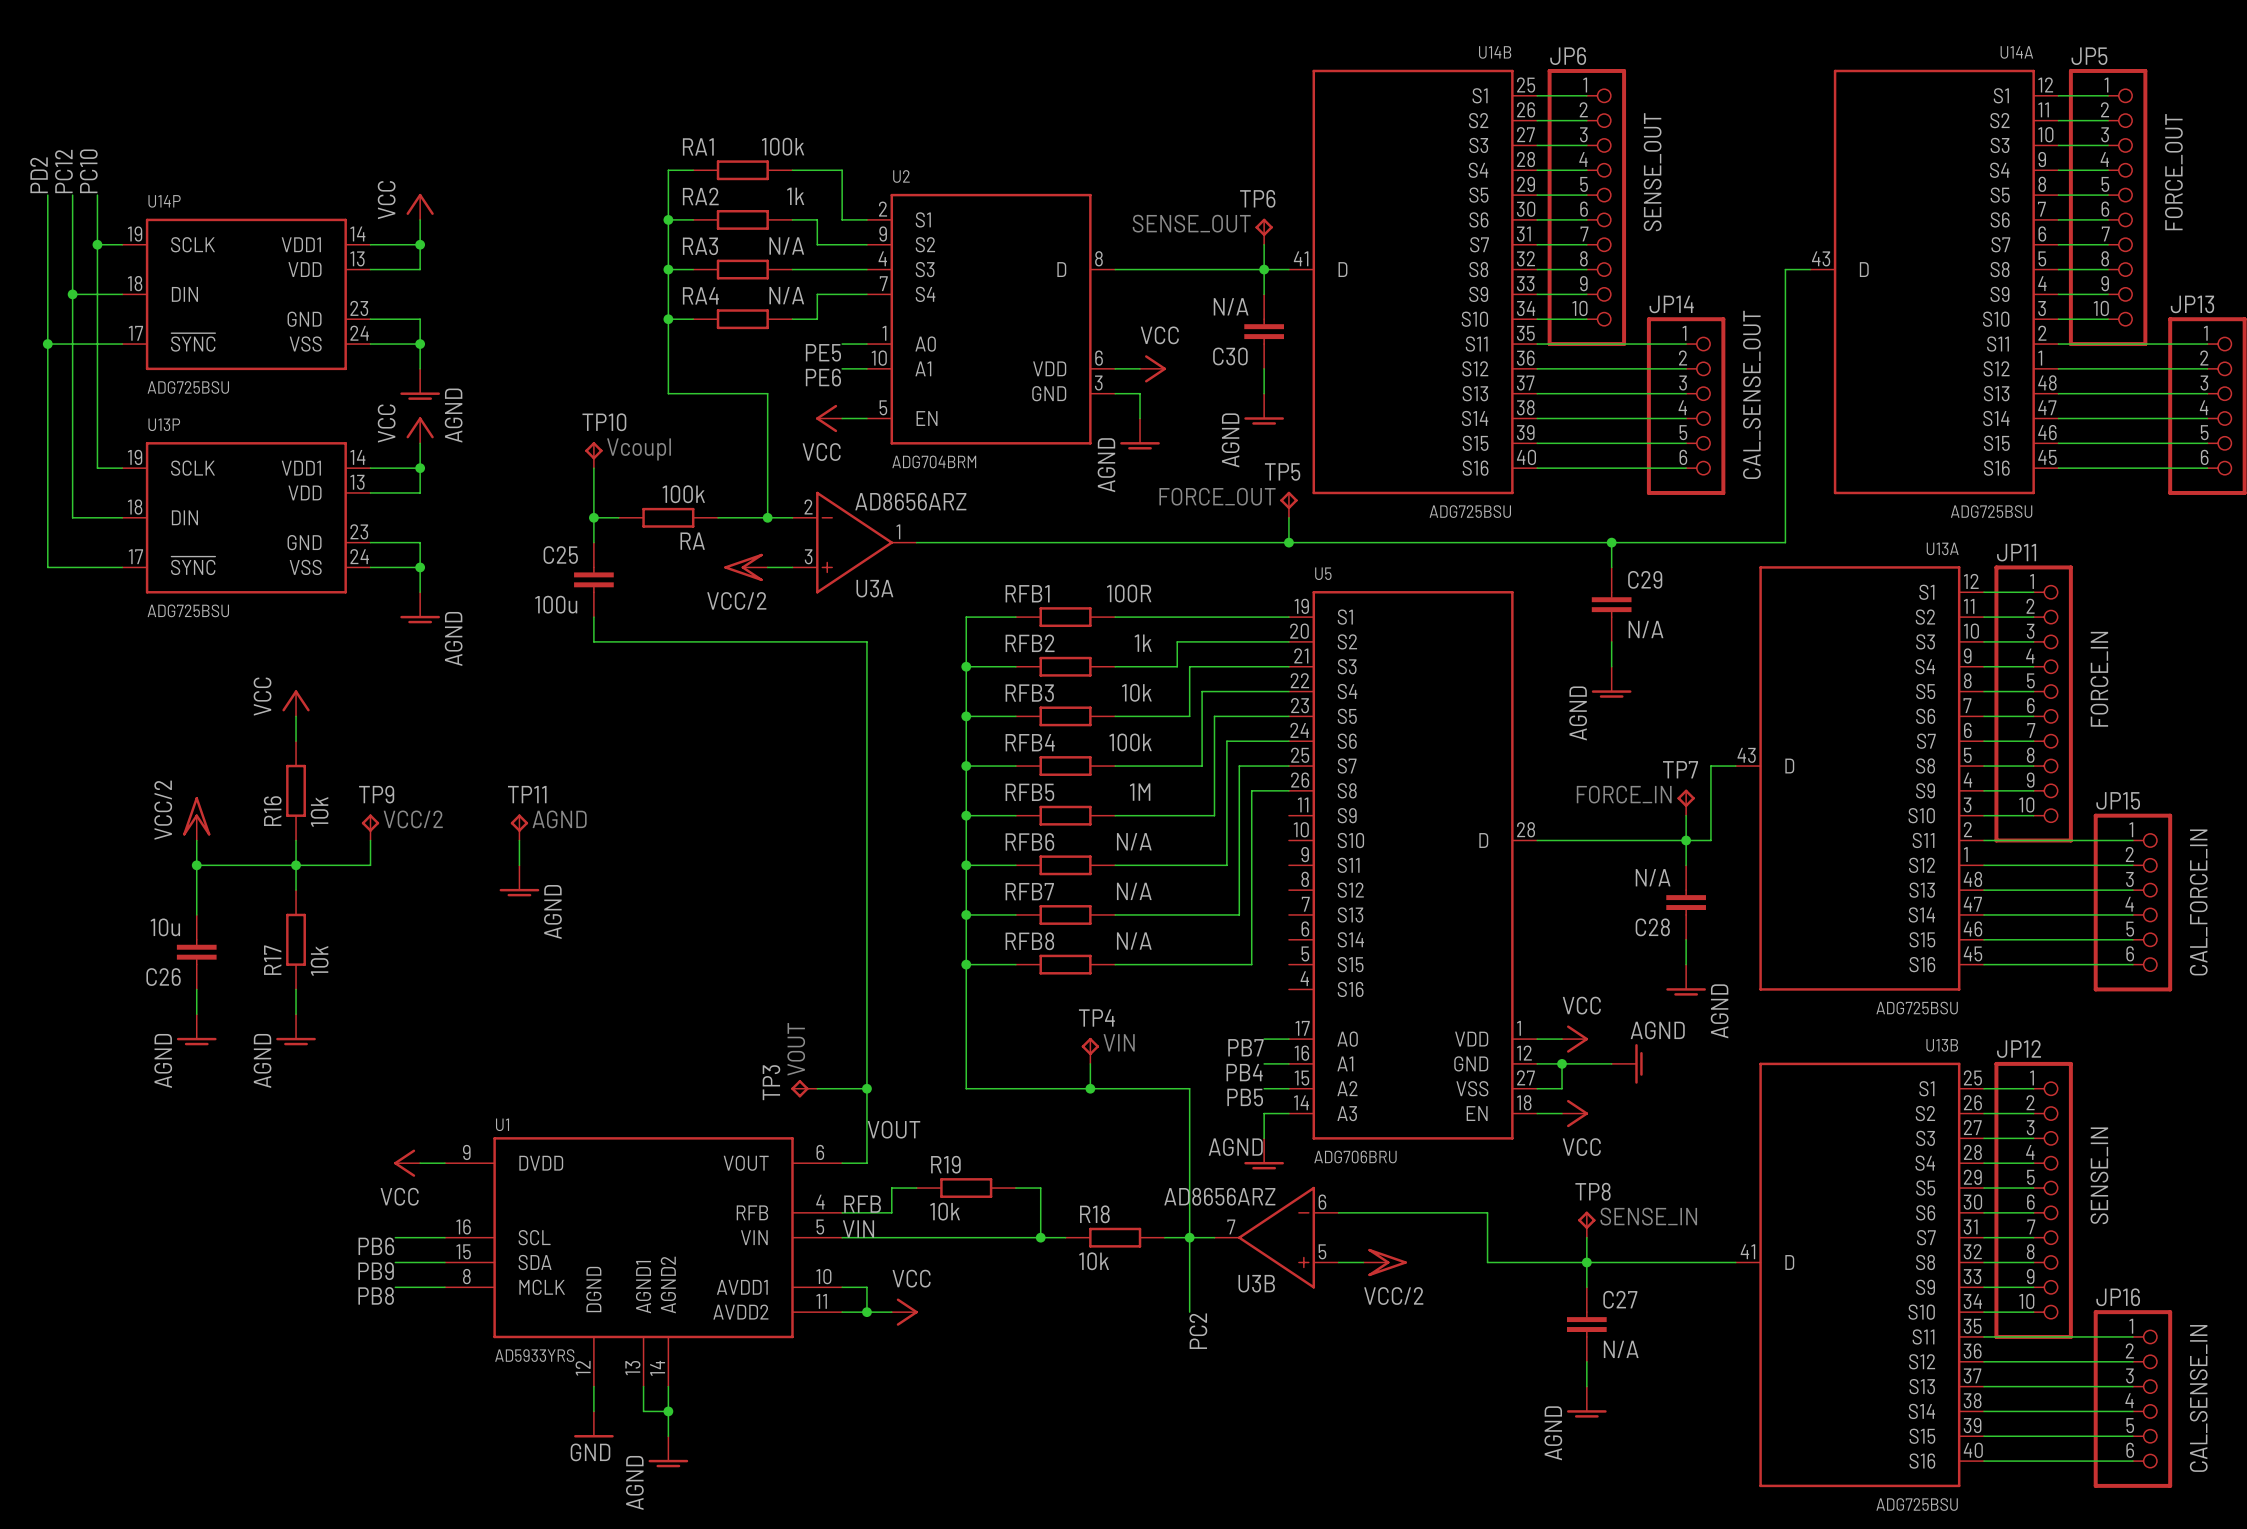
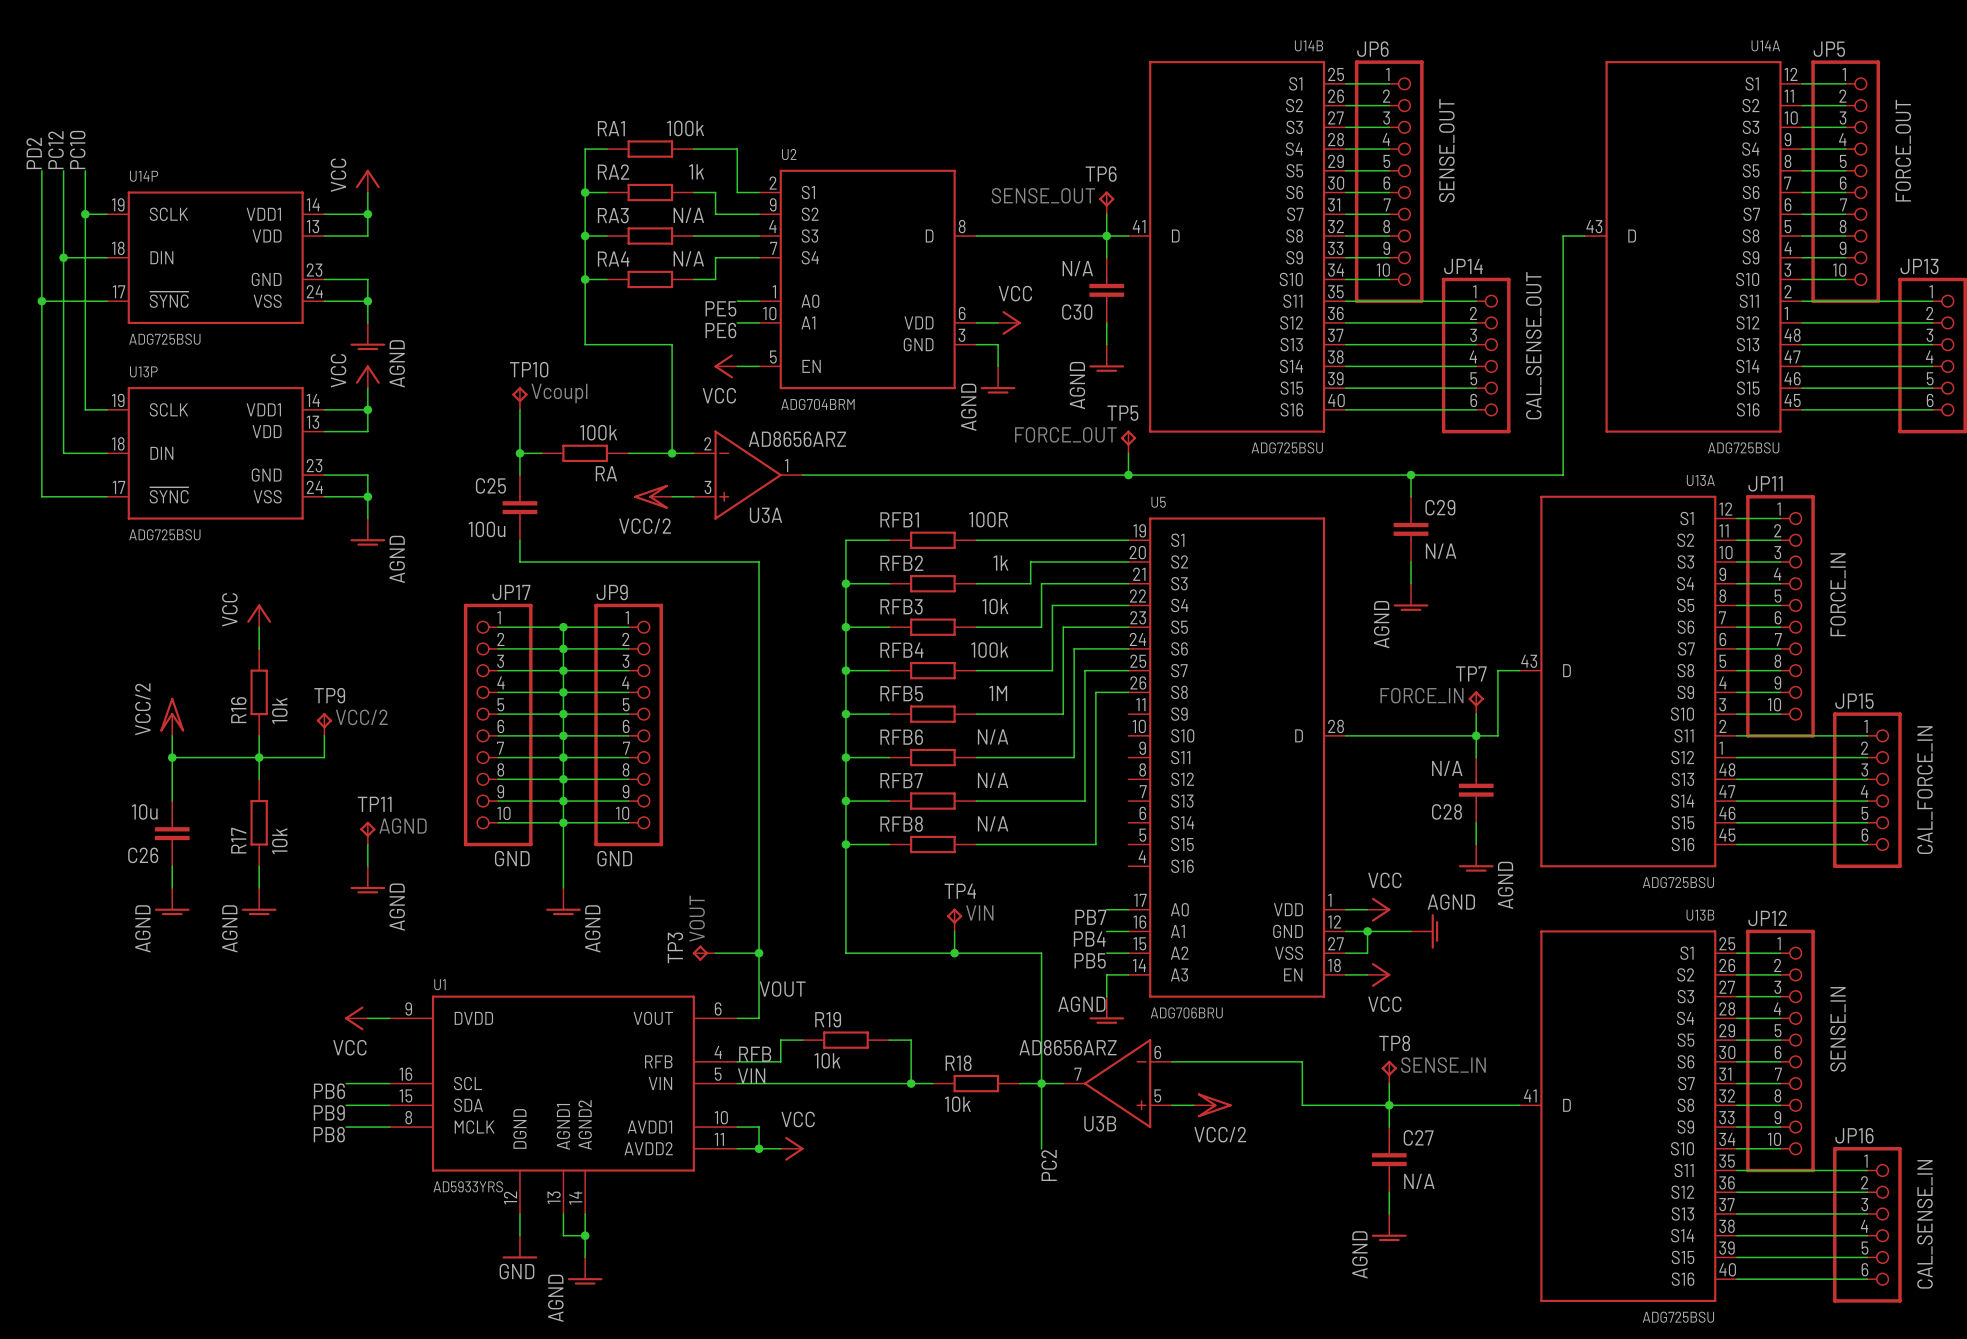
wire: none -> (498, 627) (628, 627)
wire: none -> (563, 627) (563, 887)
junction: none -> (563, 627)
wire: none -> (498, 648) (628, 648)
junction: none -> (563, 648)
wire: none -> (498, 670) (628, 670)
junction: none -> (563, 670)
wire: none -> (498, 692) (628, 692)
junction: none -> (563, 692)
wire: none -> (498, 714) (628, 714)
junction: none -> (563, 714)
TP11 position: (519, 827) -> (367, 833)
JP17: none -> GND (498, 724)
JP9: none -> GND (628, 724)
wire: (519, 840) (519, 865) -> (367, 844) (367, 866)
wire: none -> (498, 735) (628, 735)
junction: none -> (563, 735)
wire: none -> (498, 757) (628, 757)
junction: none -> (563, 757)
power symbol: AGND (519, 880) -> none
wire: none -> (498, 779) (628, 779)
junction: none -> (563, 779)
wire: none -> (498, 801) (628, 801)
junction: none -> (563, 801)
wire: none -> (498, 822) (628, 822)
junction: none -> (563, 822)
power symbol: none -> AGND (367, 879)
power symbol: none -> AGND (563, 901)

